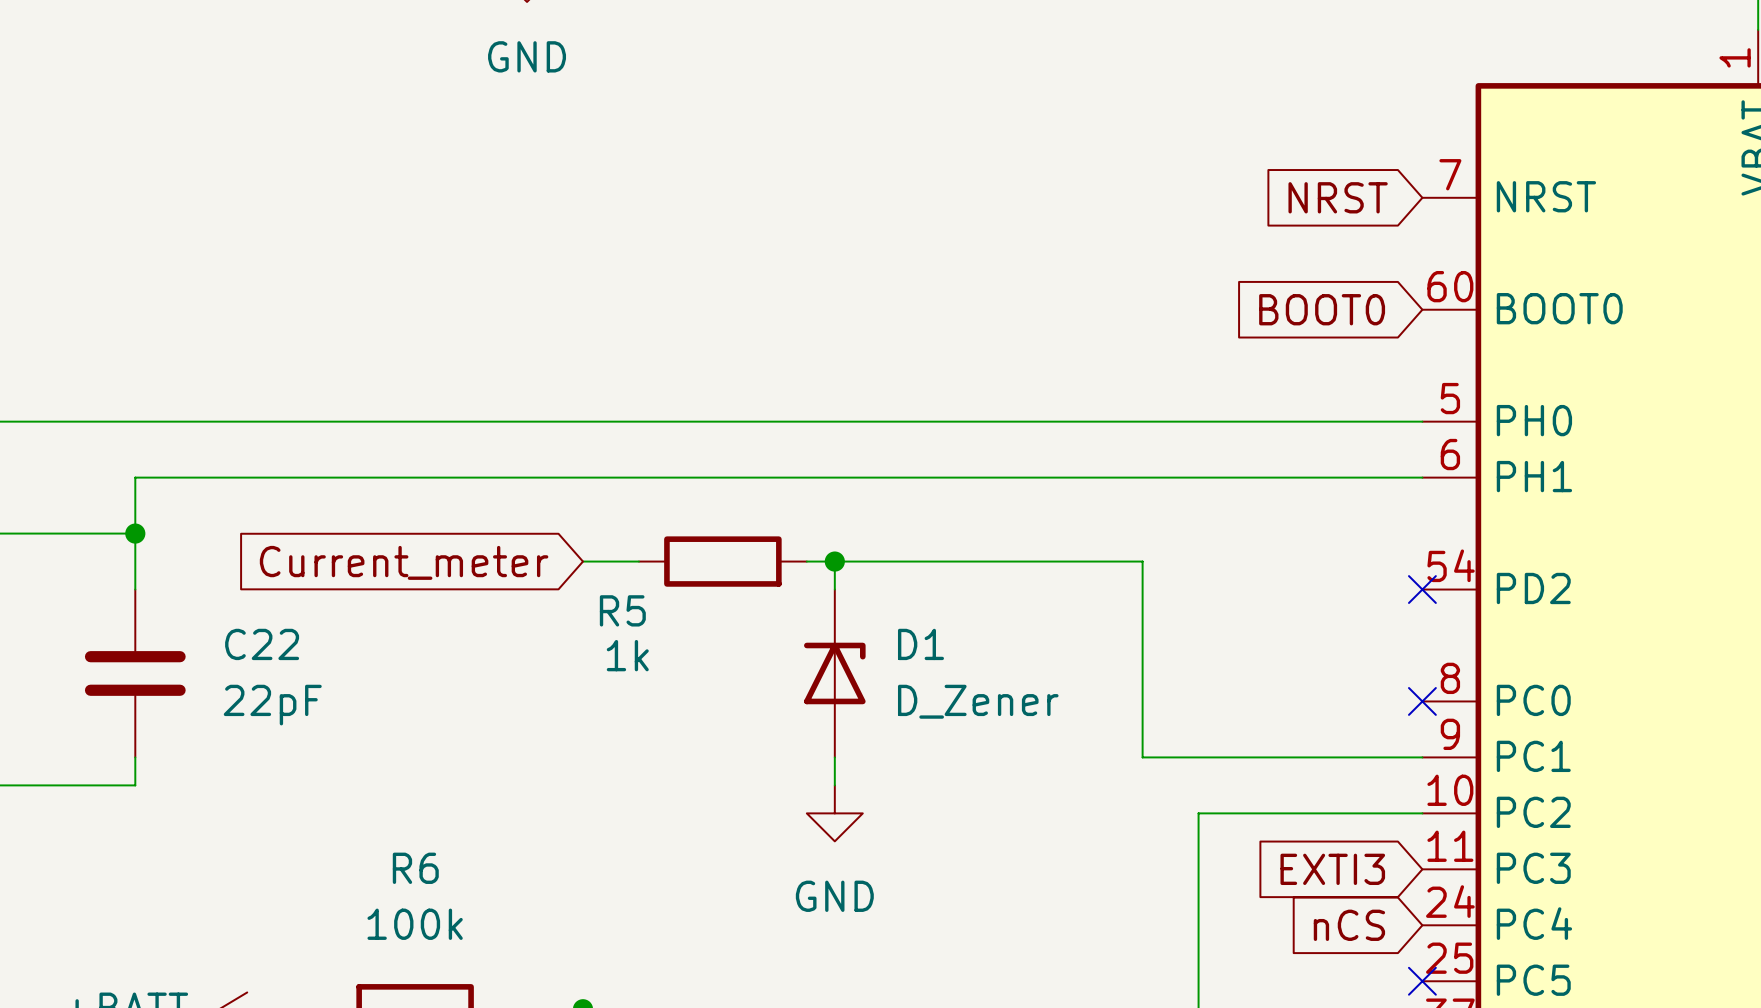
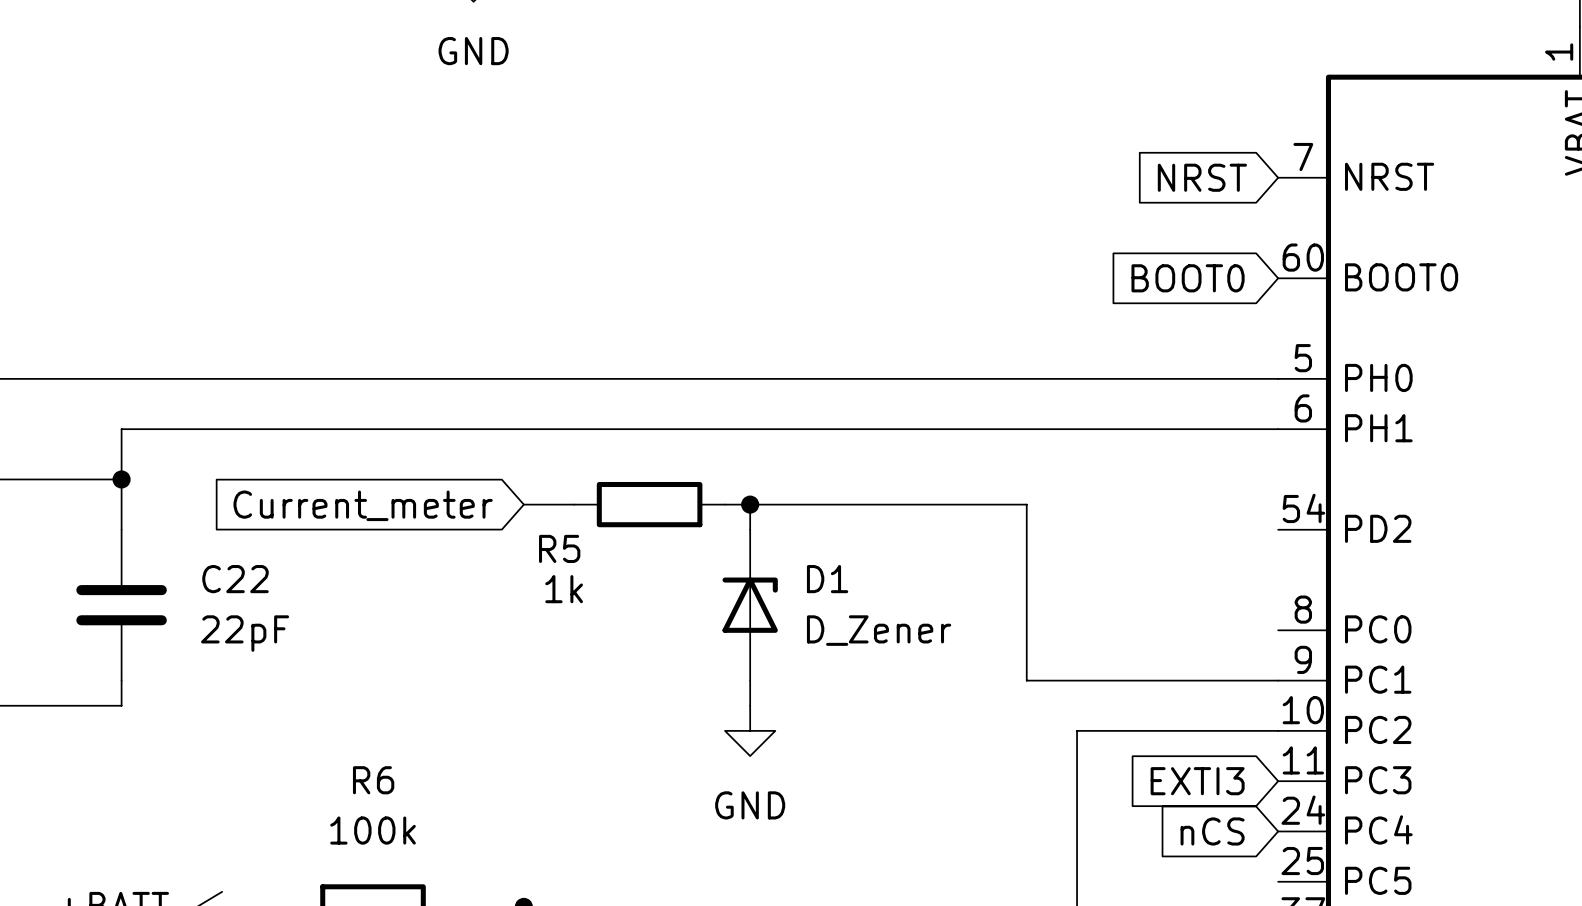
no-connect mark: (1422, 589) -> none
no-connect mark: (1422, 701) -> none
no-connect mark: (1422, 981) -> none

